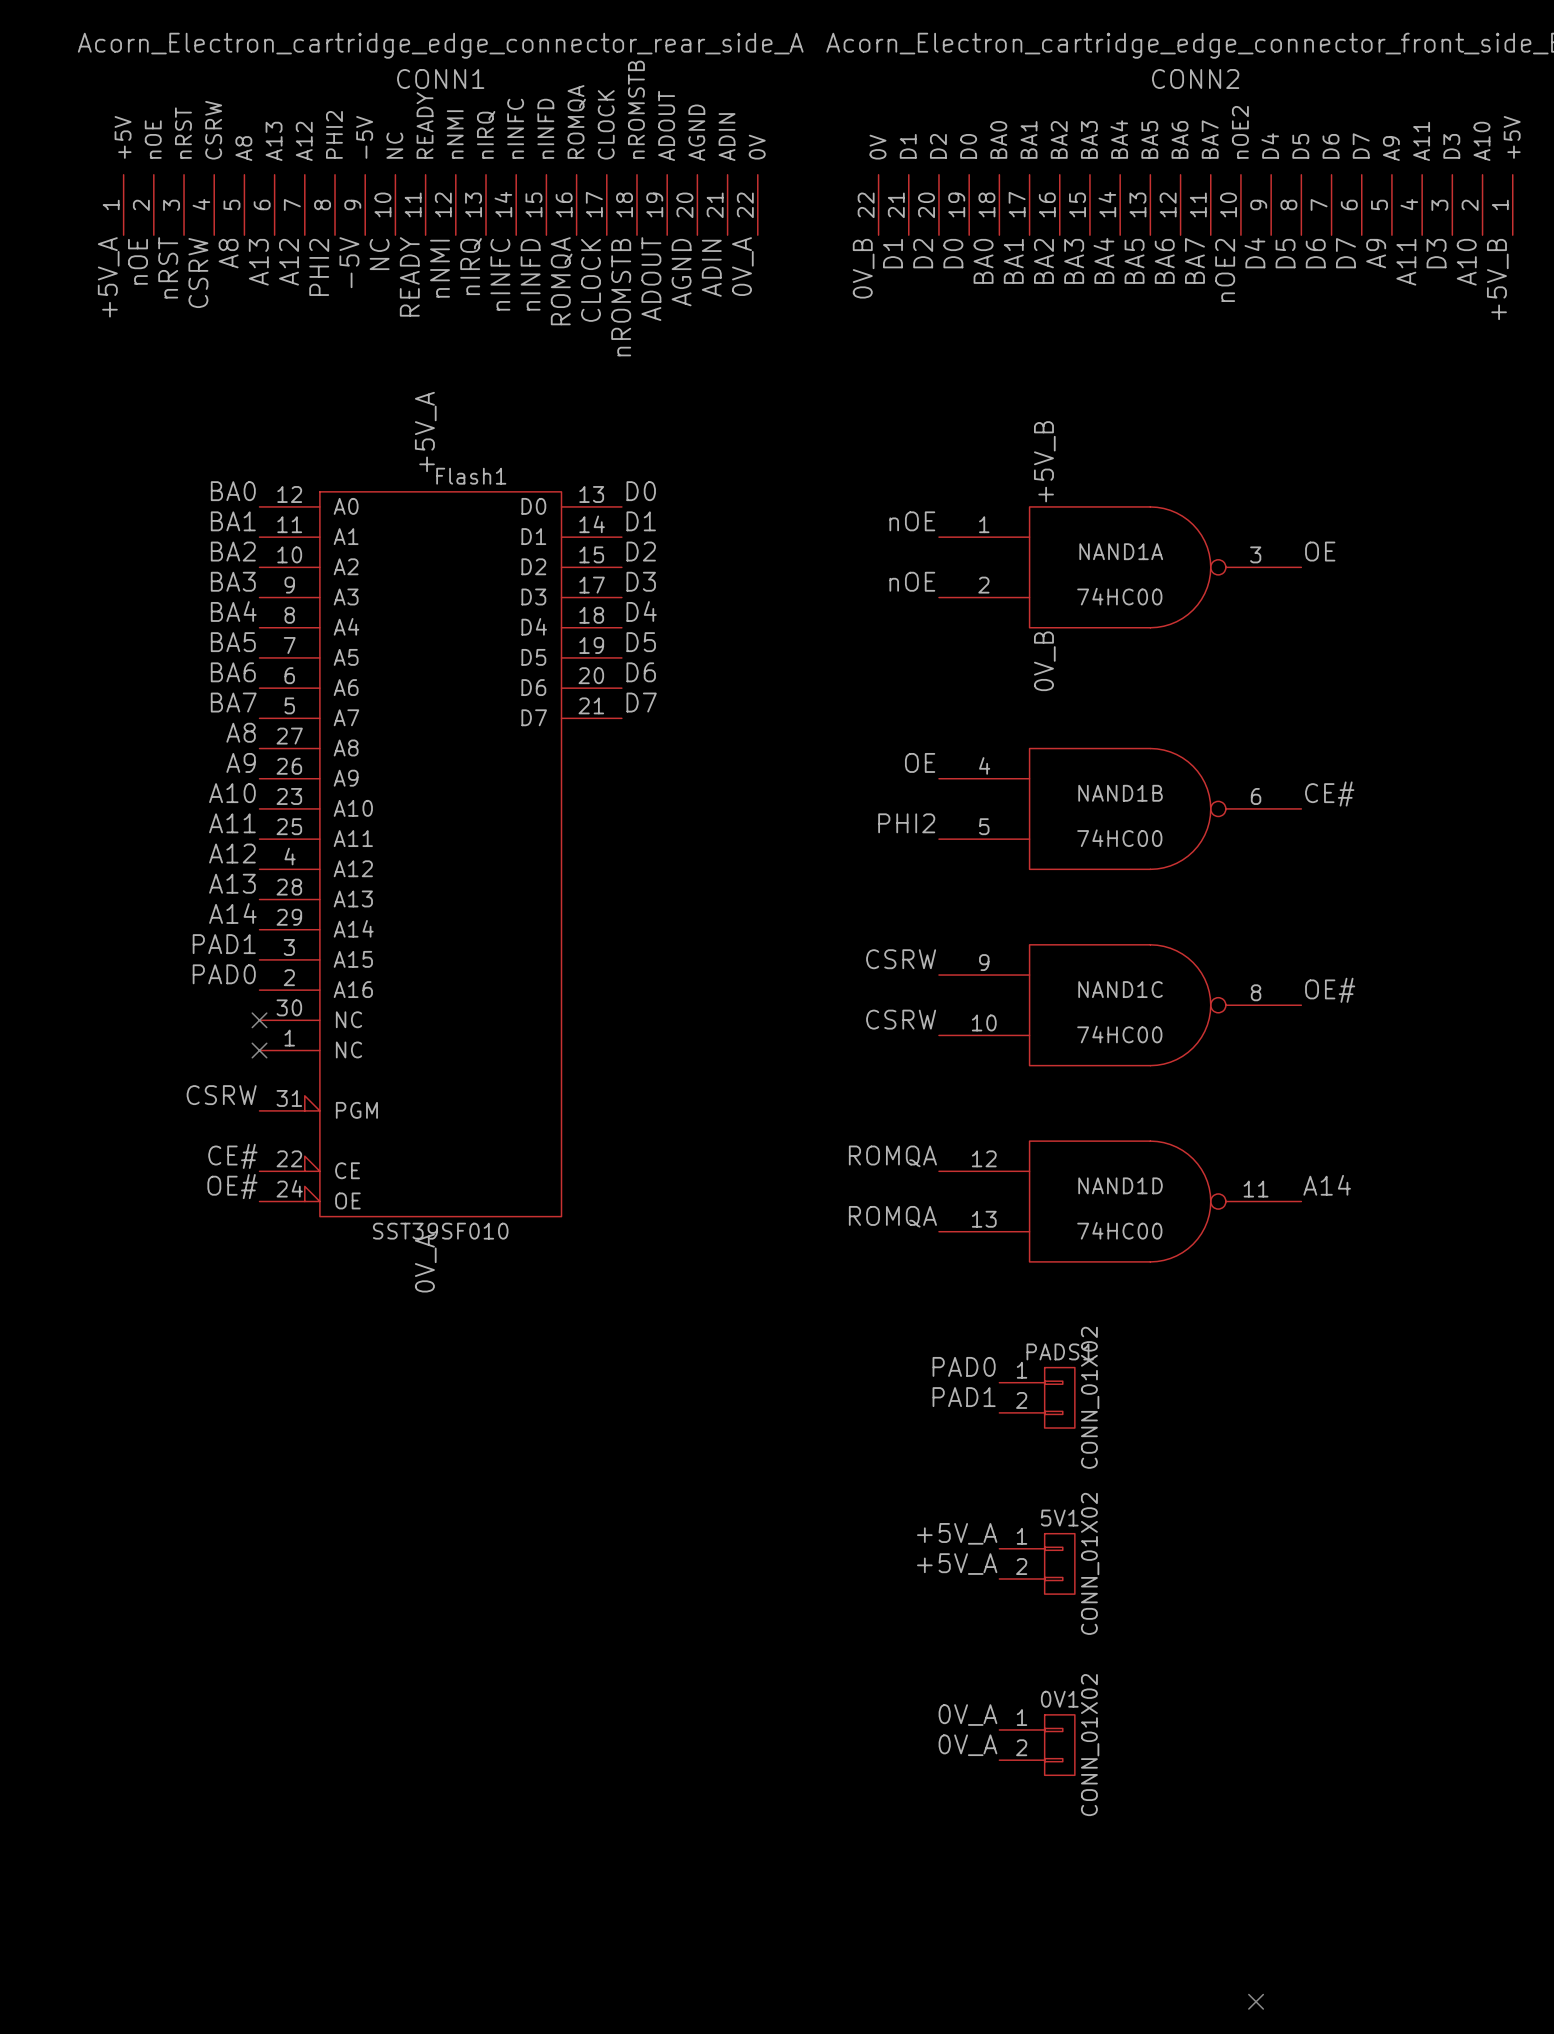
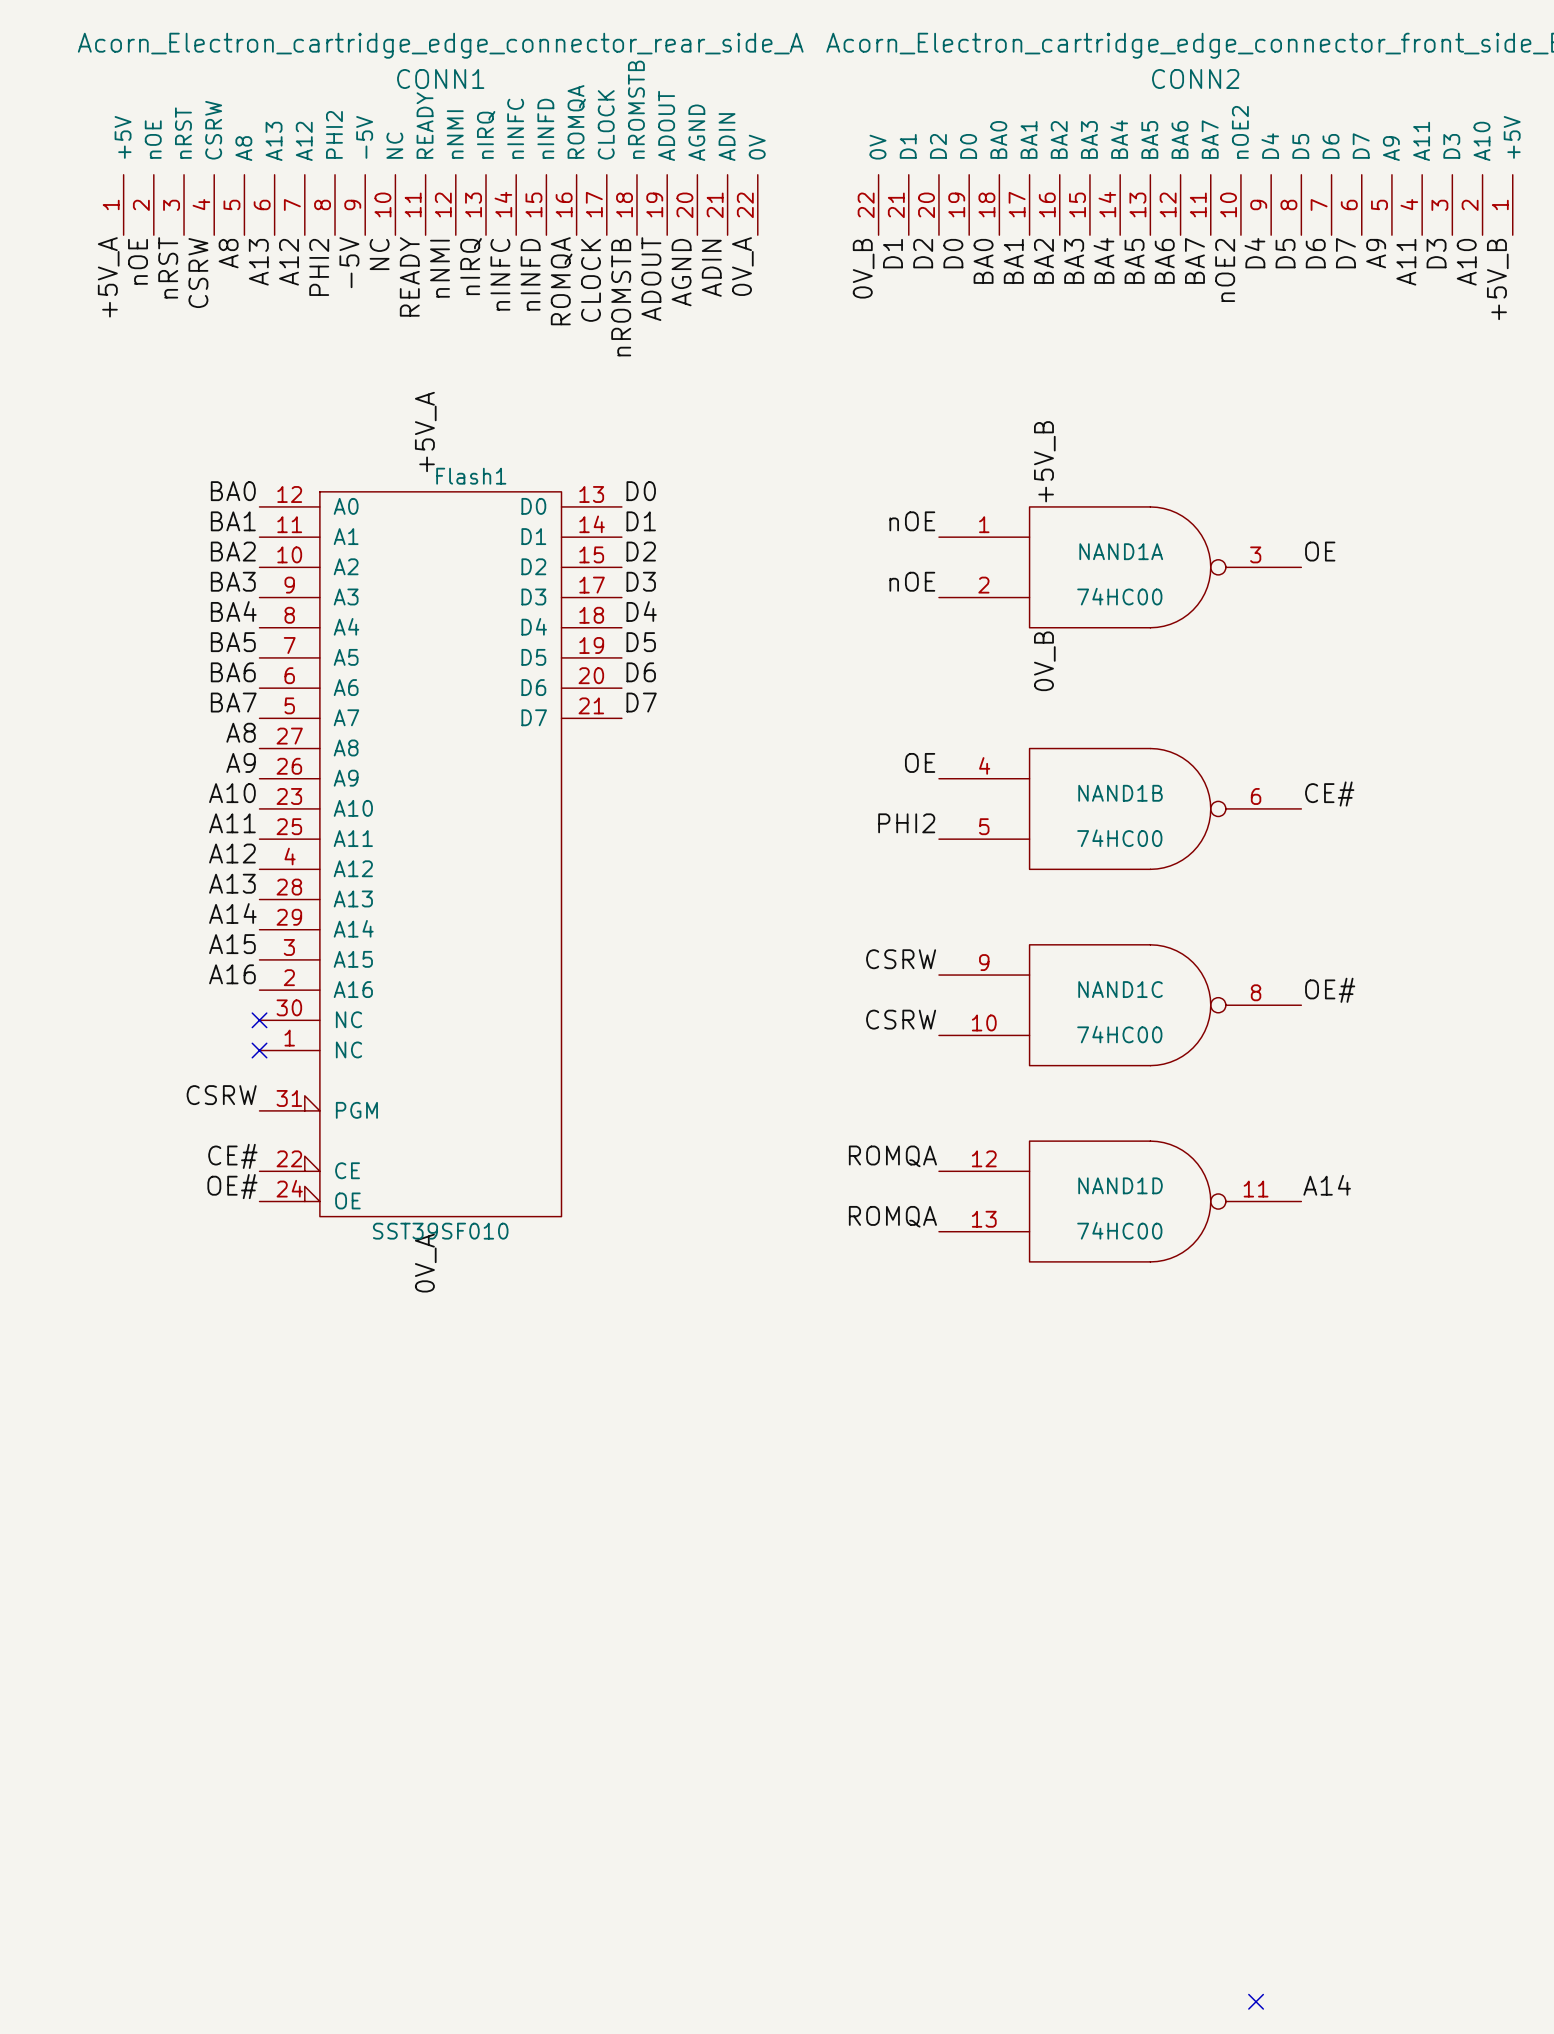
label: PAD1 (224, 944) -> A15 (232, 944)
label: PAD0 (224, 974) -> A16 (232, 974)
label: PAD0 (964, 1366) -> none
label: PAD1 (964, 1397) -> none
PADS1: CONN_01X02 (1037, 1397) -> none
label: +5V_A (957, 1533) -> none
5V1: CONN_01X02 (1037, 1563) -> none
label: +5V_A (957, 1564) -> none
label: 0V_A (967, 1715) -> none
label: 0V_A (967, 1745) -> none
0V1: CONN_01X02 (1037, 1745) -> none

